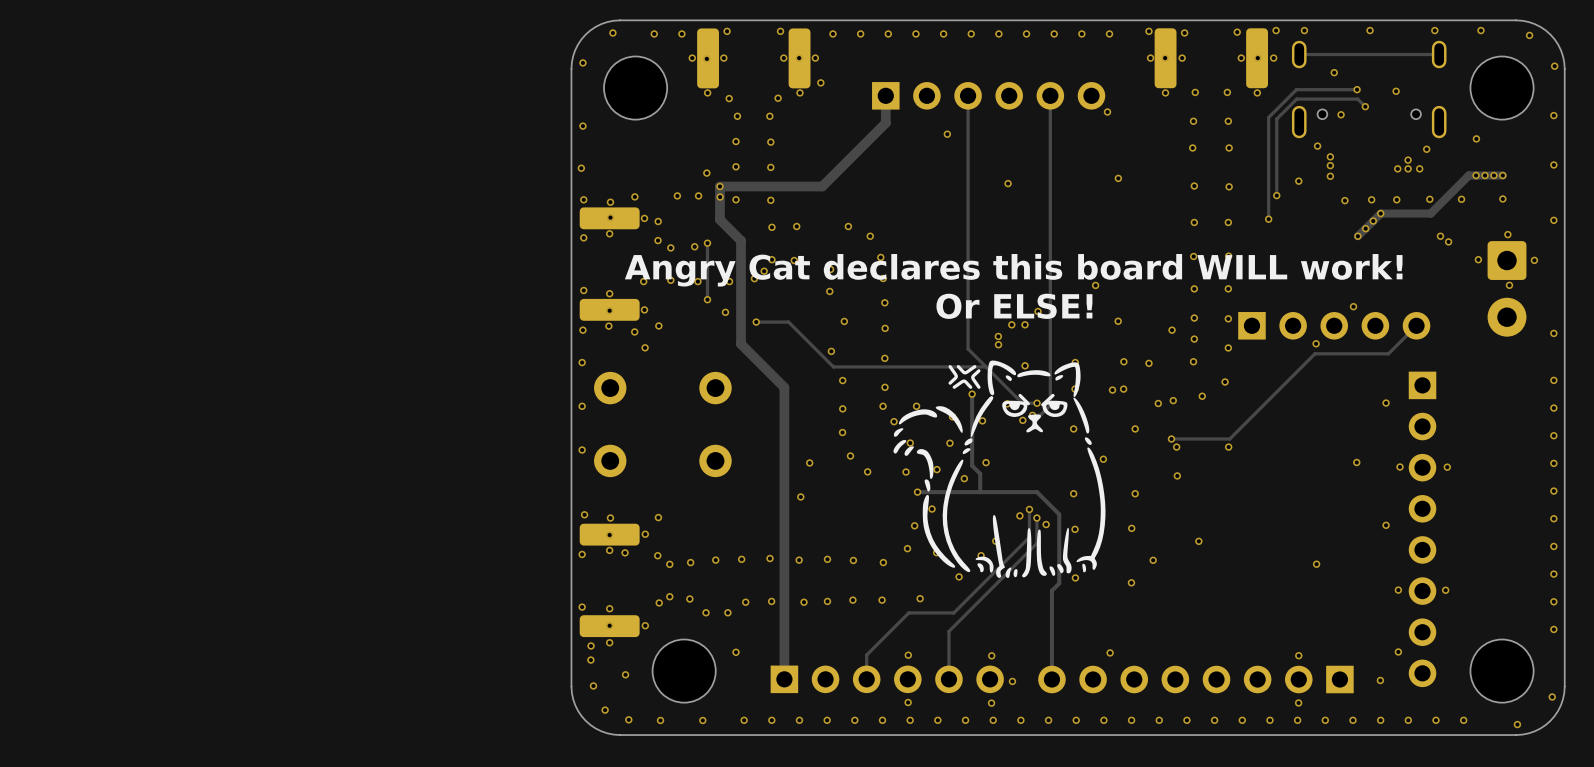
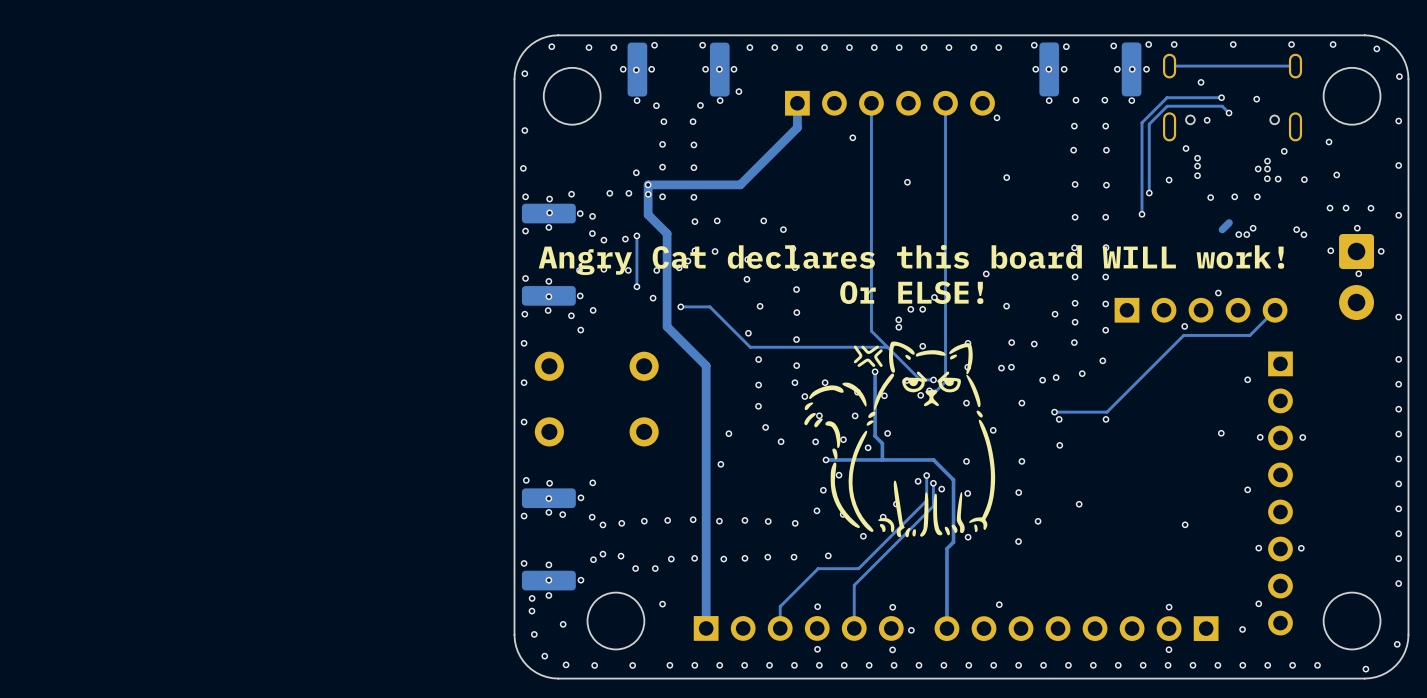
via: (1419, 168) -> none
via: (1476, 175) -> none
via: (1493, 175) -> none
track: (1502, 175) (1468, 175) (1430, 213) (1380, 213) (1365, 228) -> none
via: (1502, 175) -> none
via: none -> (1267, 178)
via: none -> (1278, 179)
via: none -> (1304, 179)
via: (1502, 198) -> none
via: (1429, 199) -> none
via: (1461, 199) -> none
via: none -> (1330, 208)
via: none -> (1346, 208)
via: none -> (1370, 208)
via: (1380, 213) -> none
via: (1373, 221) -> none
via: (1365, 228) -> none
via: none -> (1253, 228)
via: (1357, 236) -> none
via: none -> (1238, 234)
via: none -> (1246, 234)

